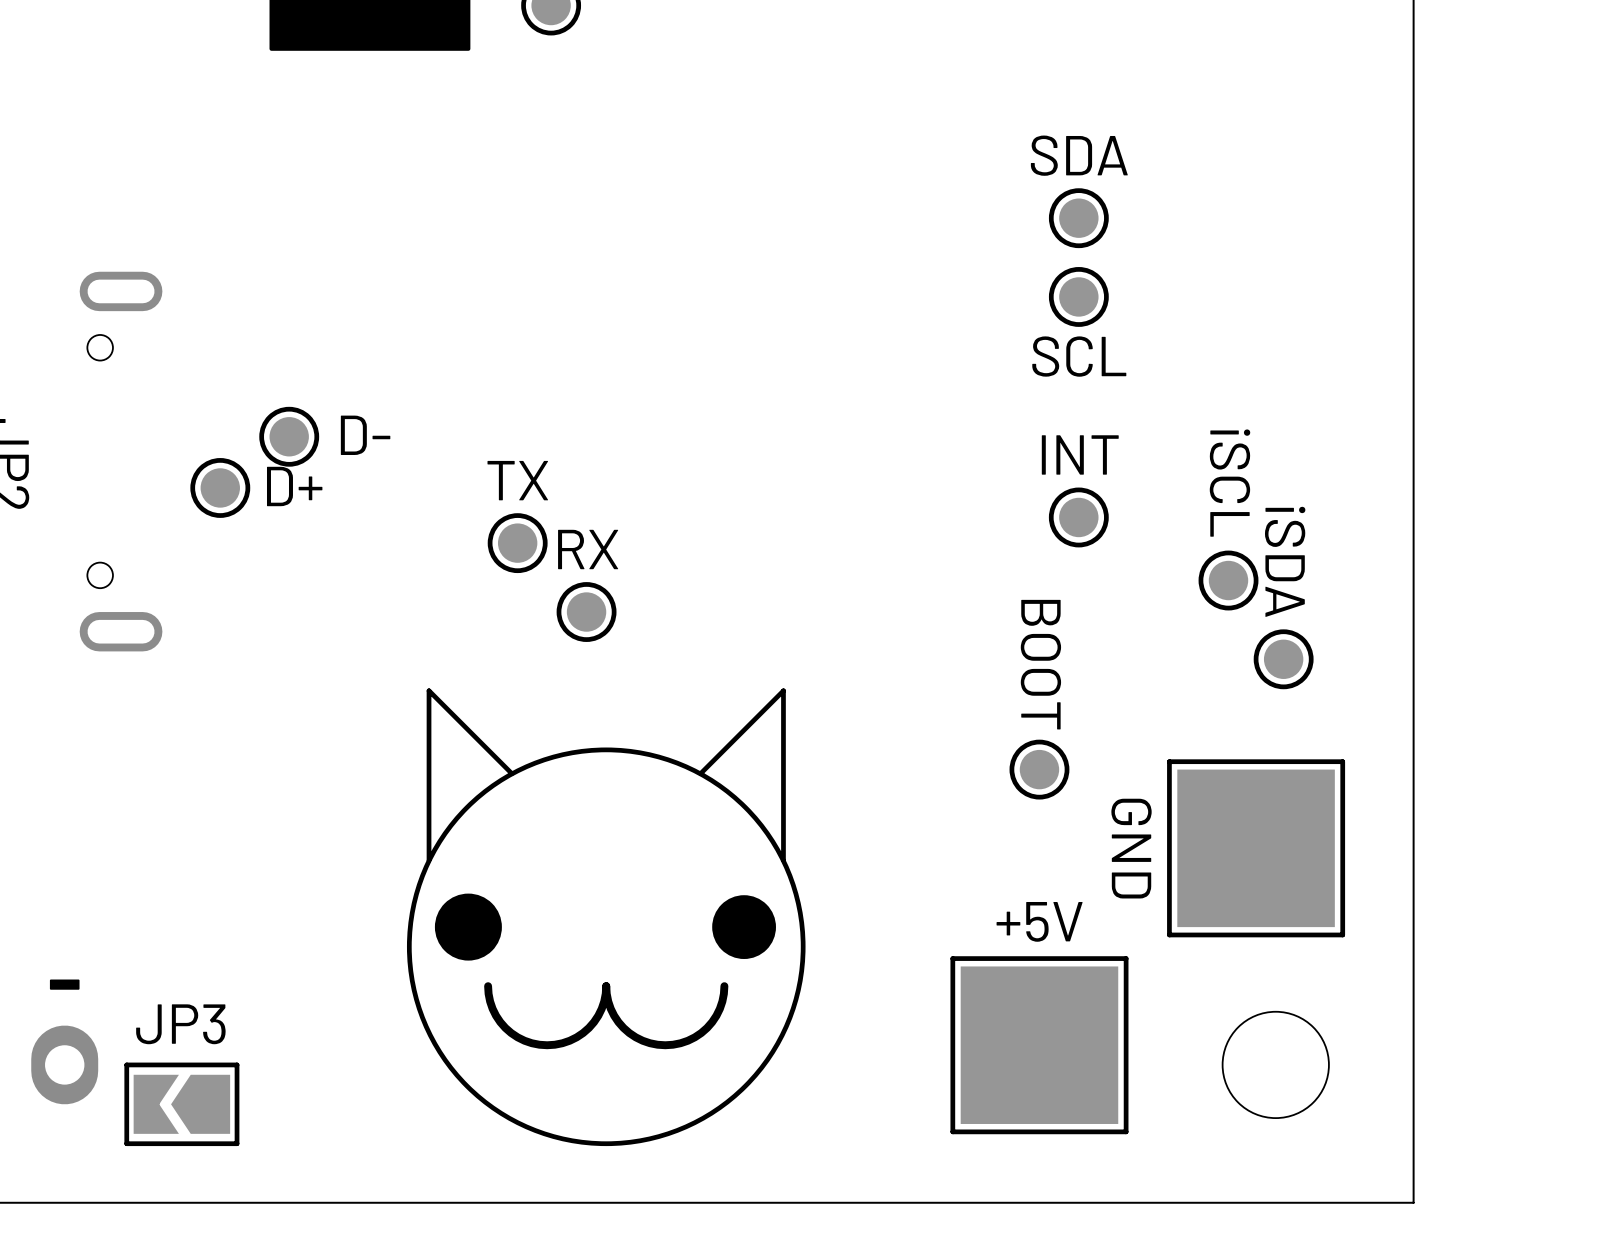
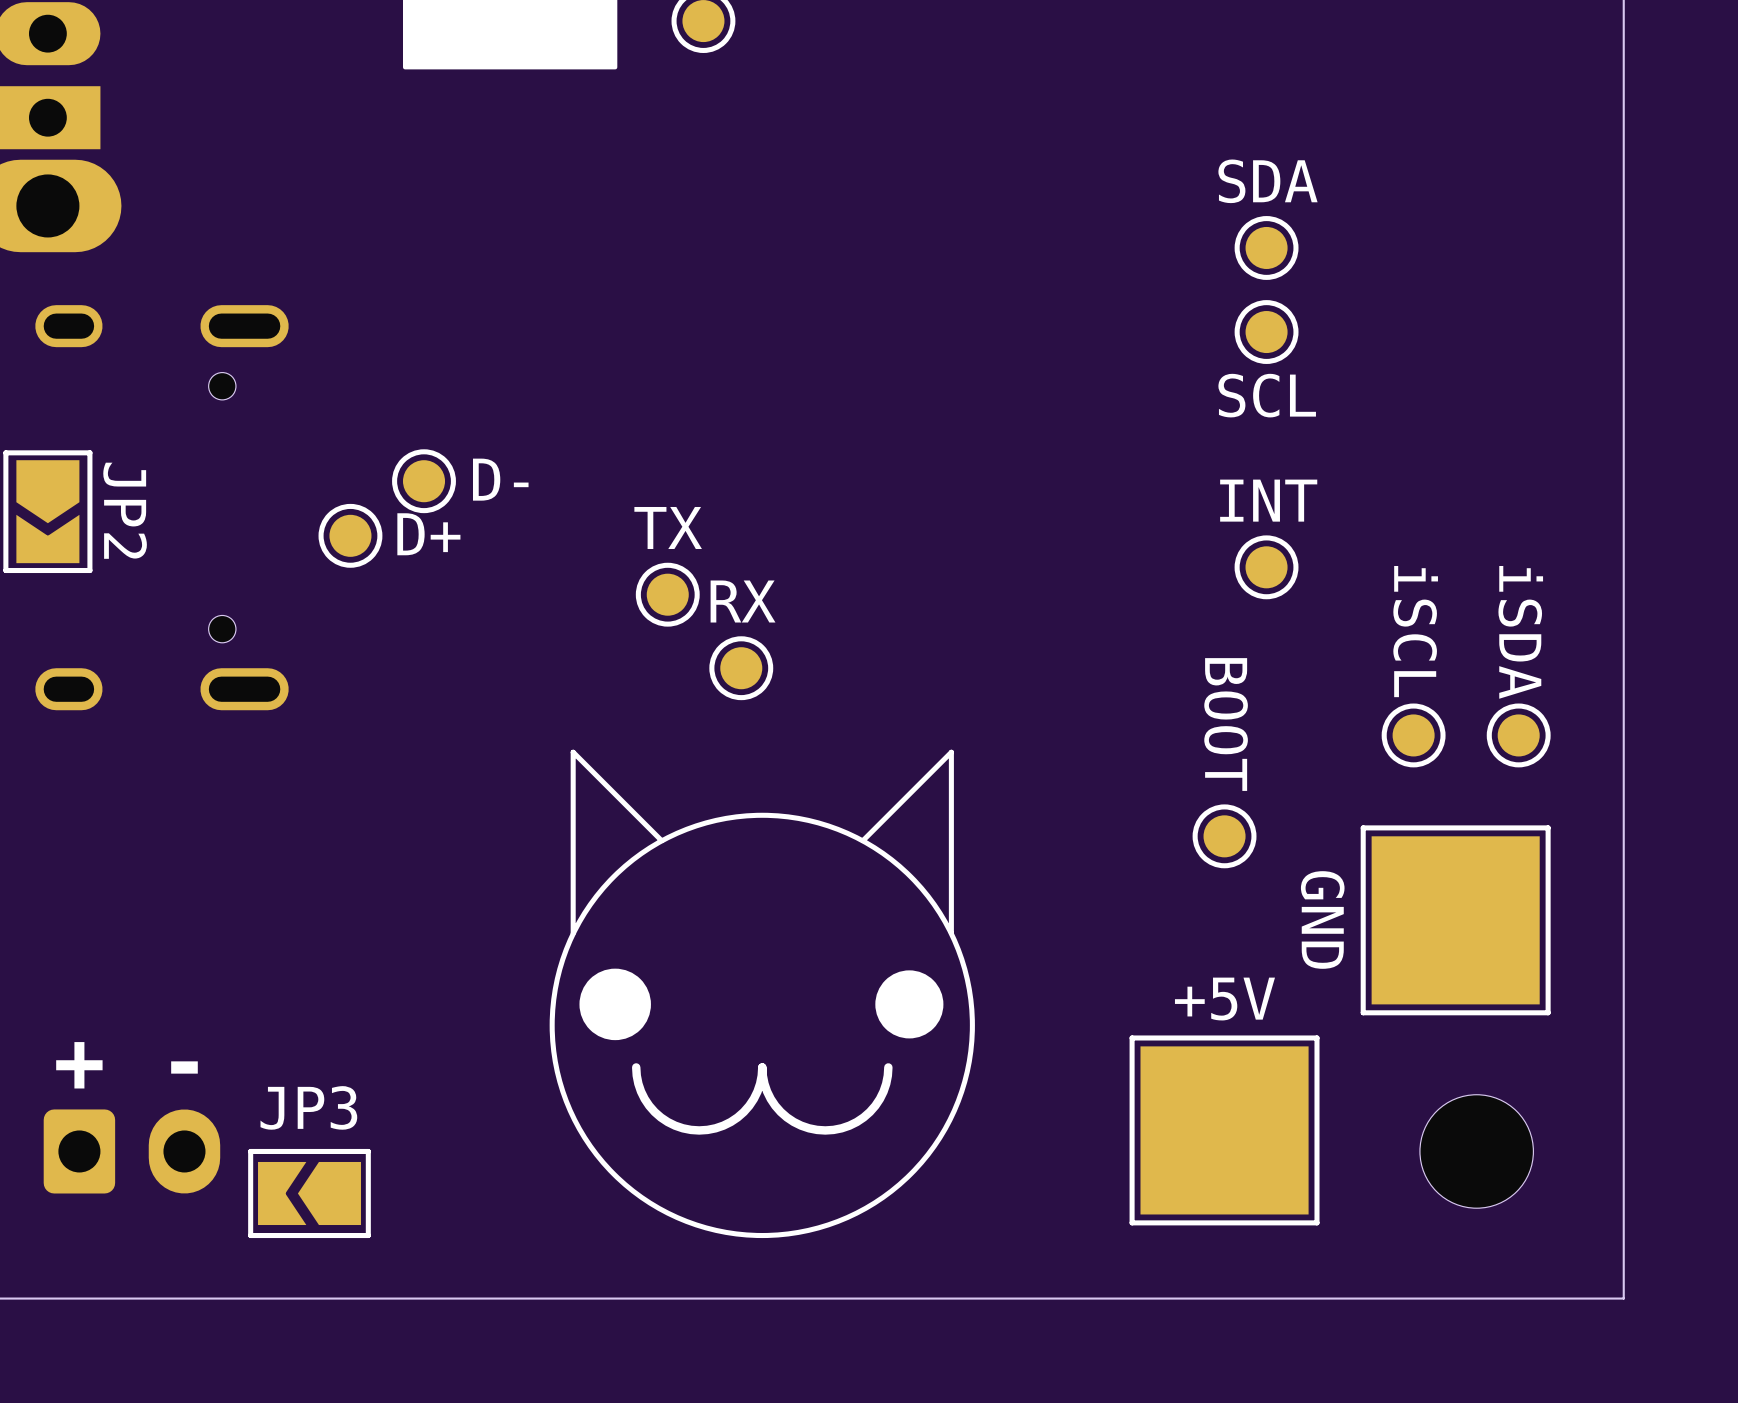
part position: (1228, 580) -> (1413, 735)
part position: (1283, 659) -> (1518, 735)

